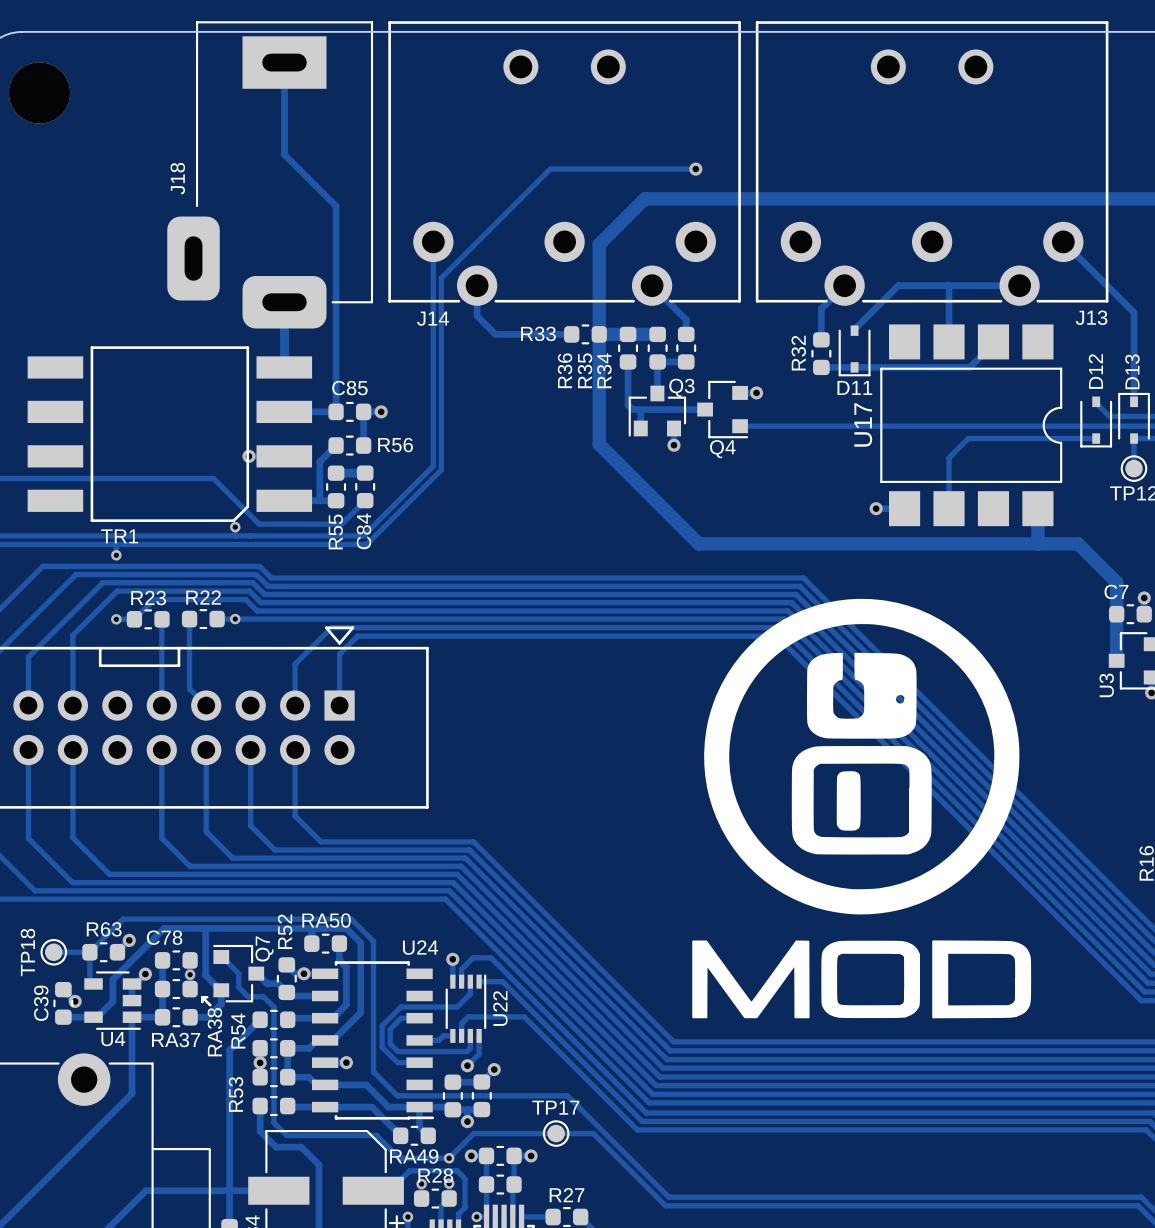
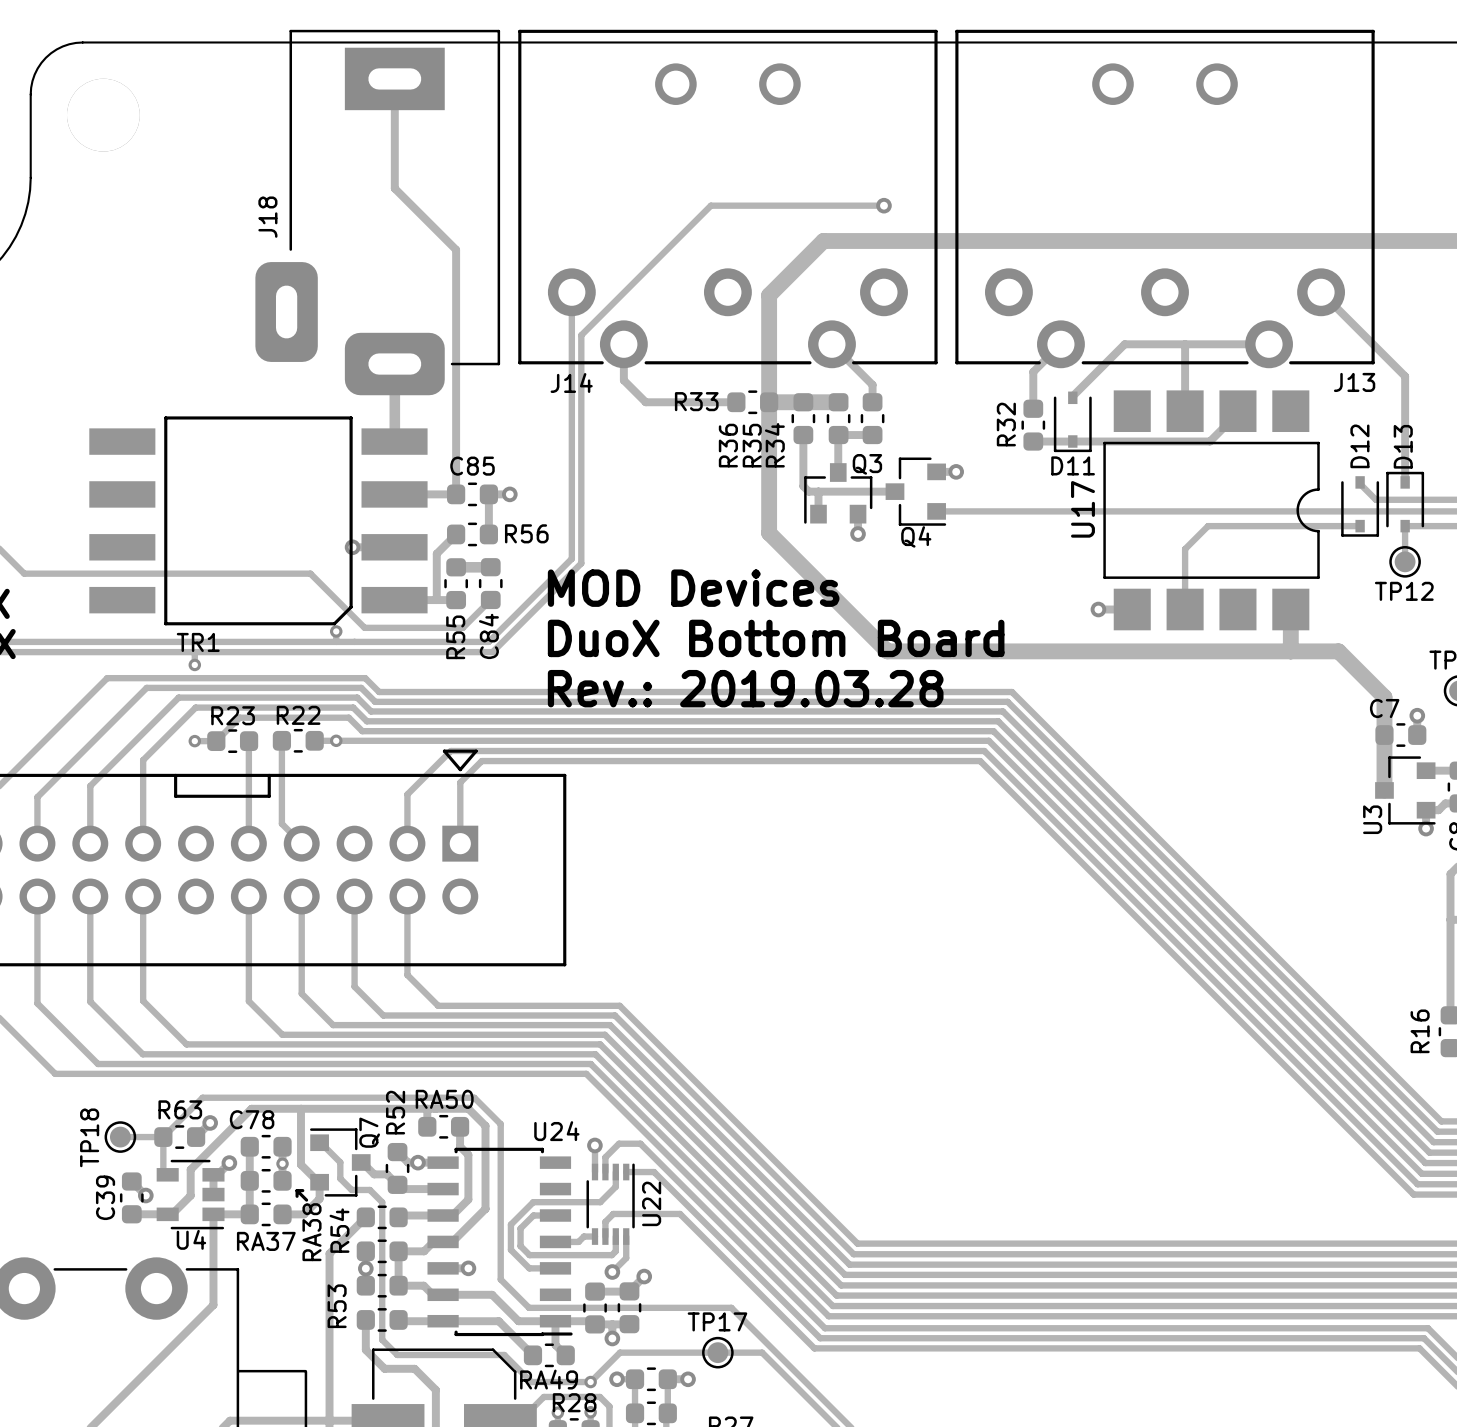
text: none -> MOD Devices (693, 588)
text: none -> DuoX Bottom Board (776, 638)
text: none -> Rev.: 2019.03.28 (745, 688)
drawing: [692, 598, 1032, 1019] -> none

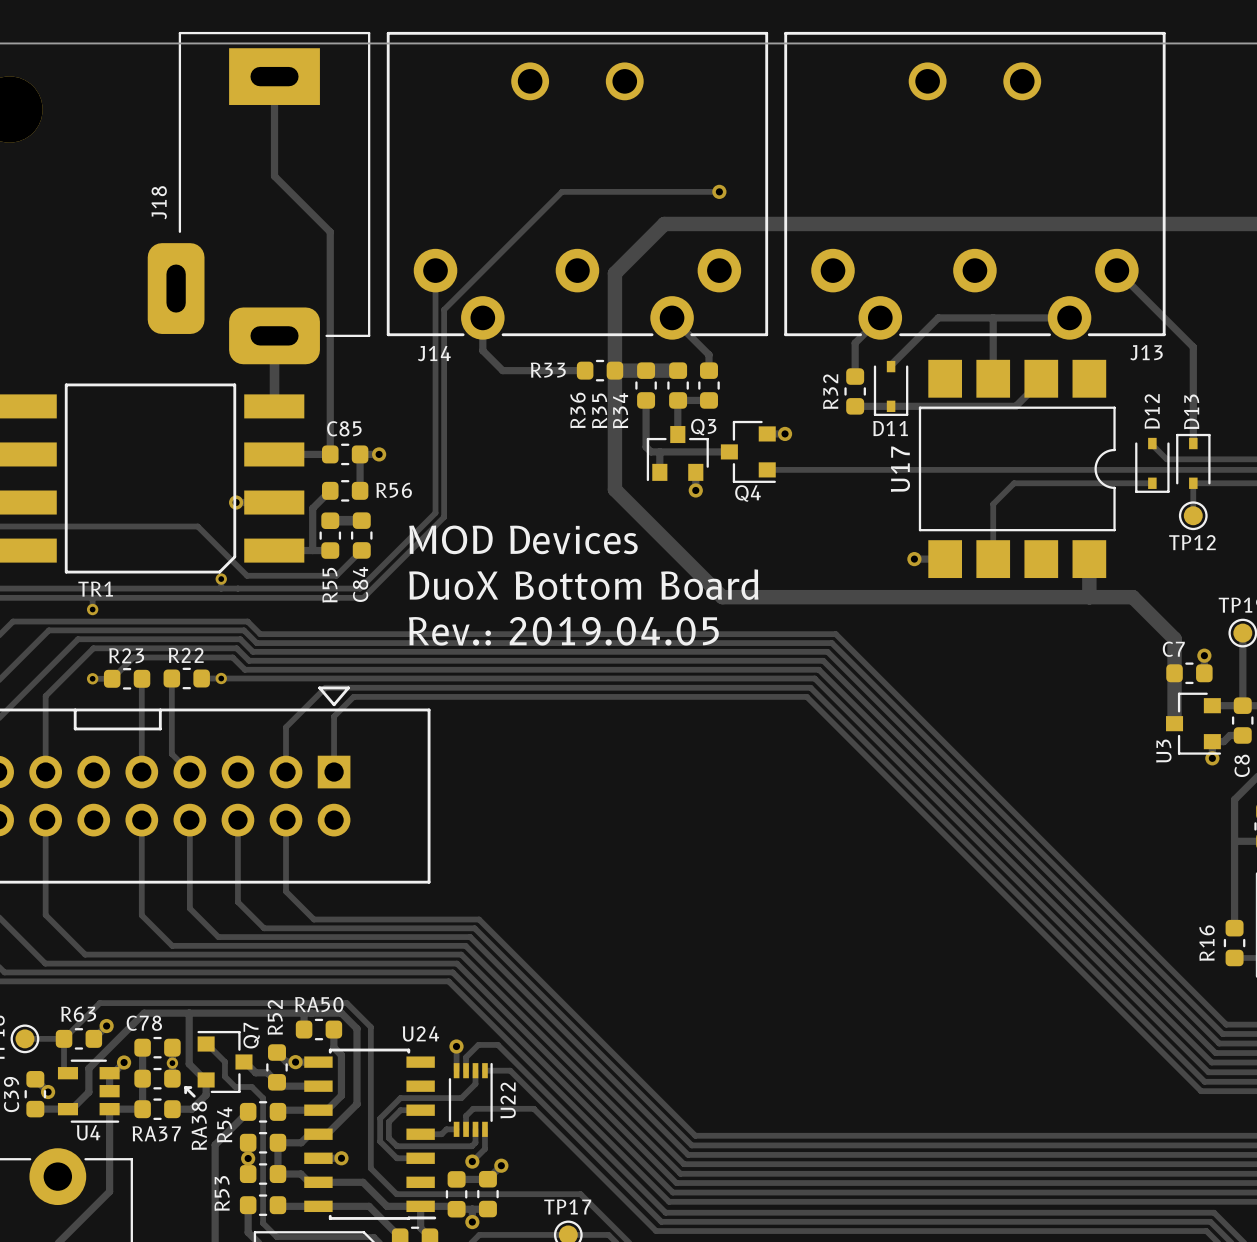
text: Rev.: 2019.03.28 (745, 688) -> Rev.: 2019.04.05 (563, 631)

